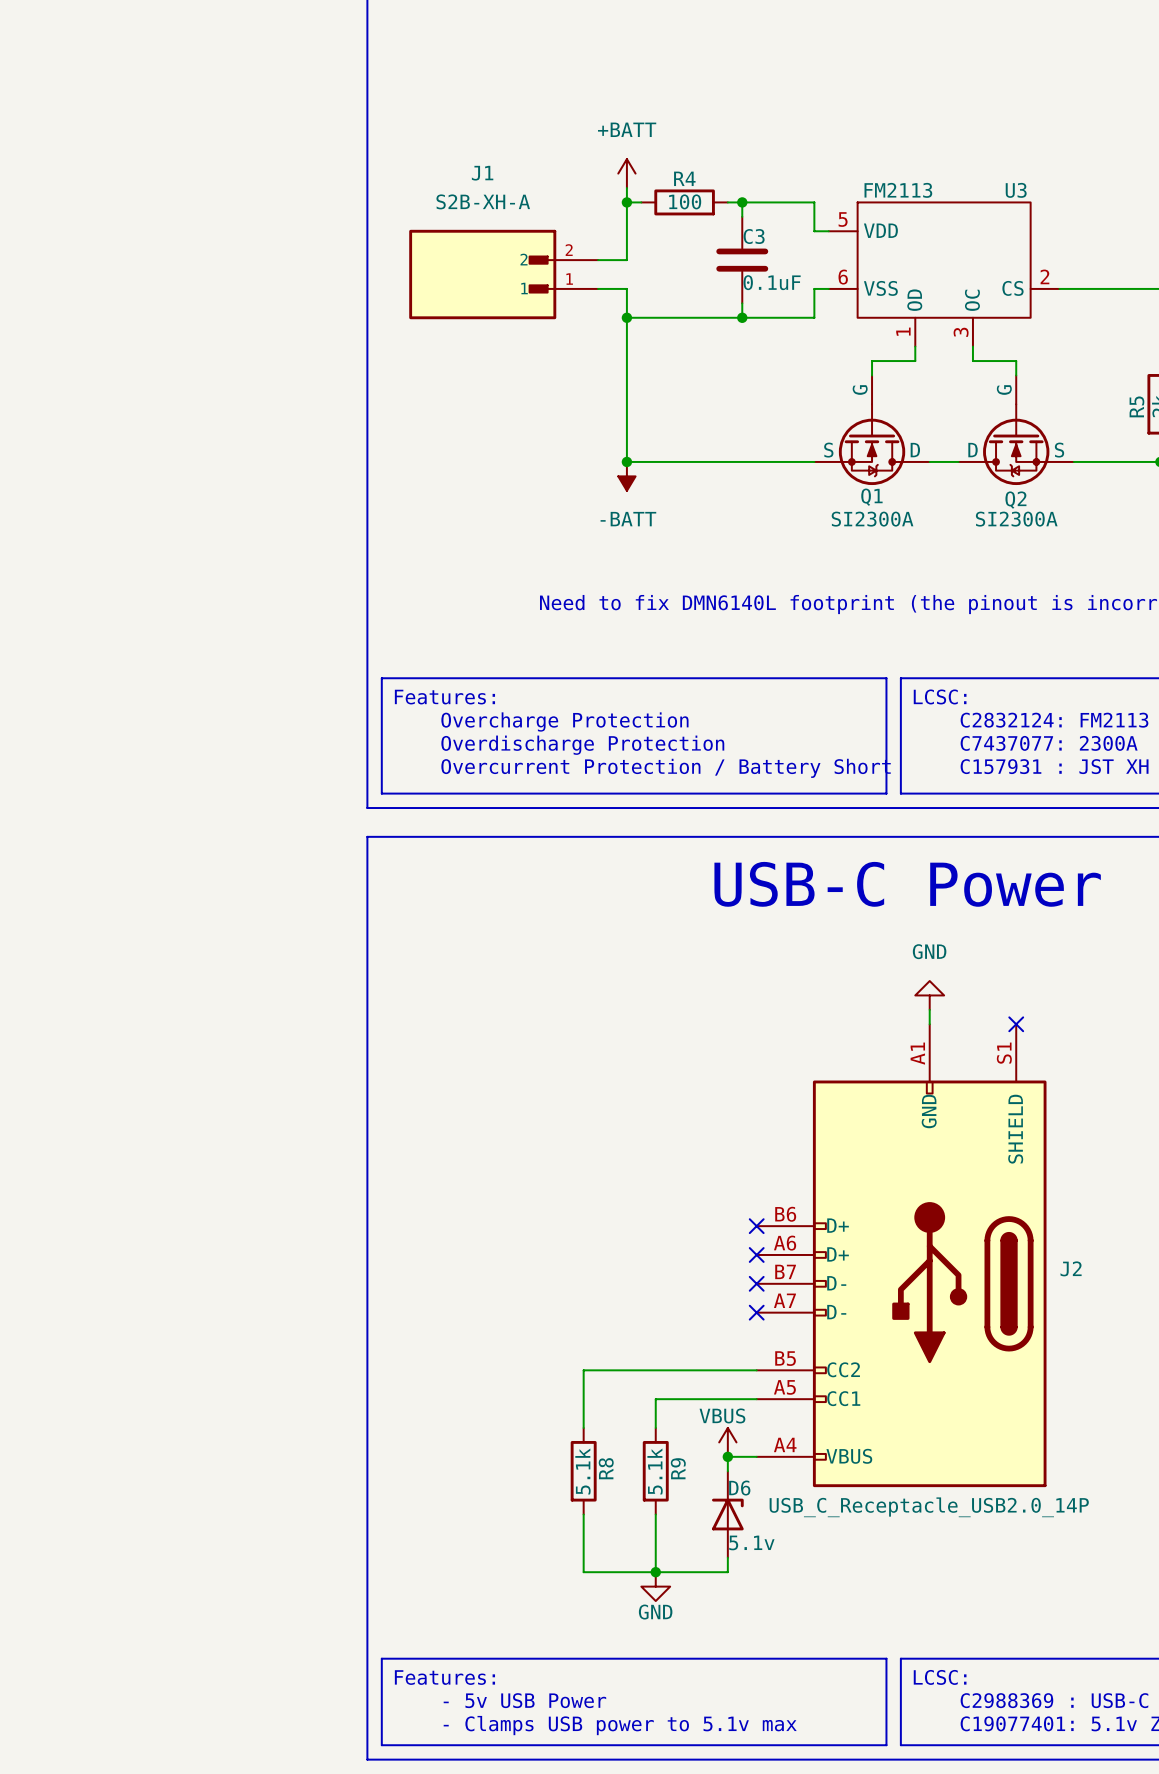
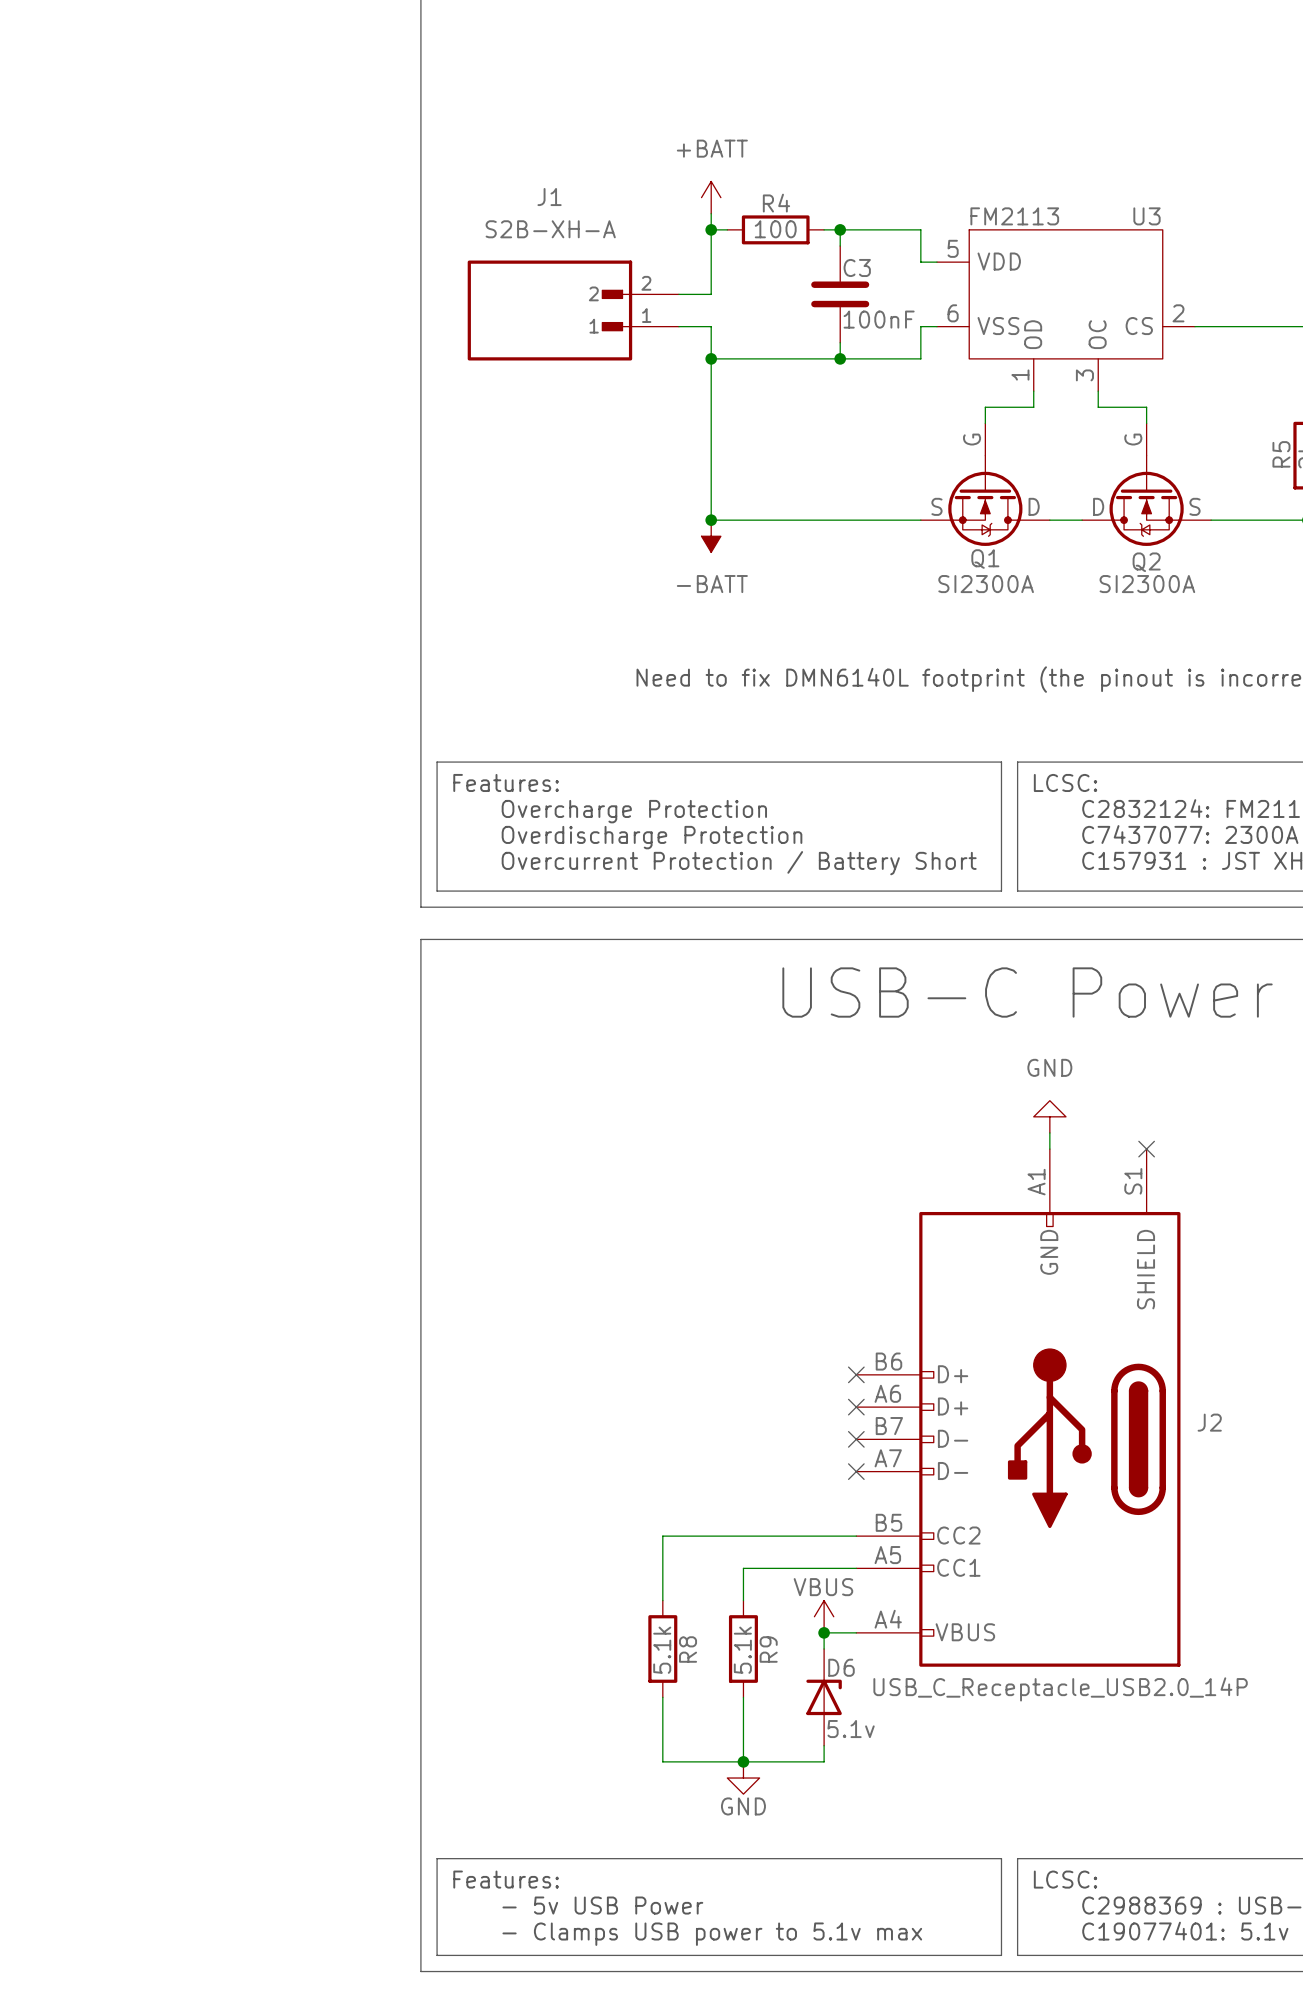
C3 value: 0.1uF (772, 282) -> 100nF (879, 319)

